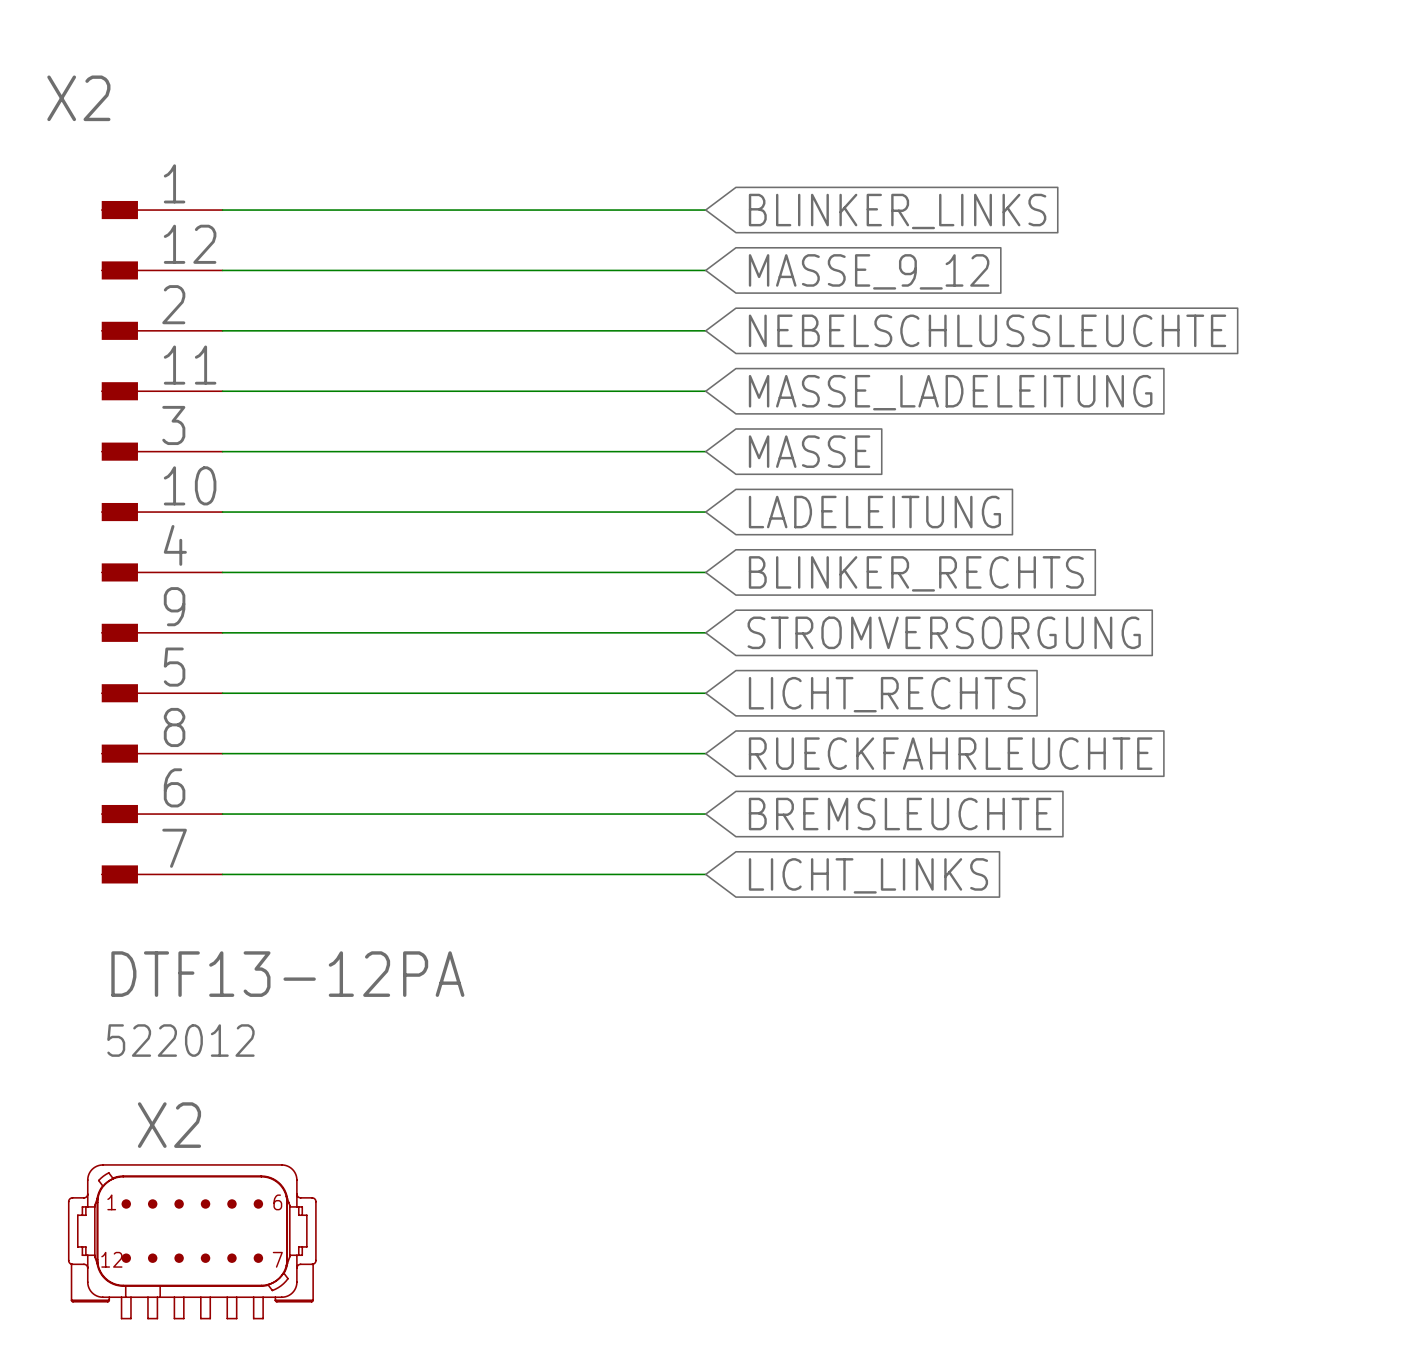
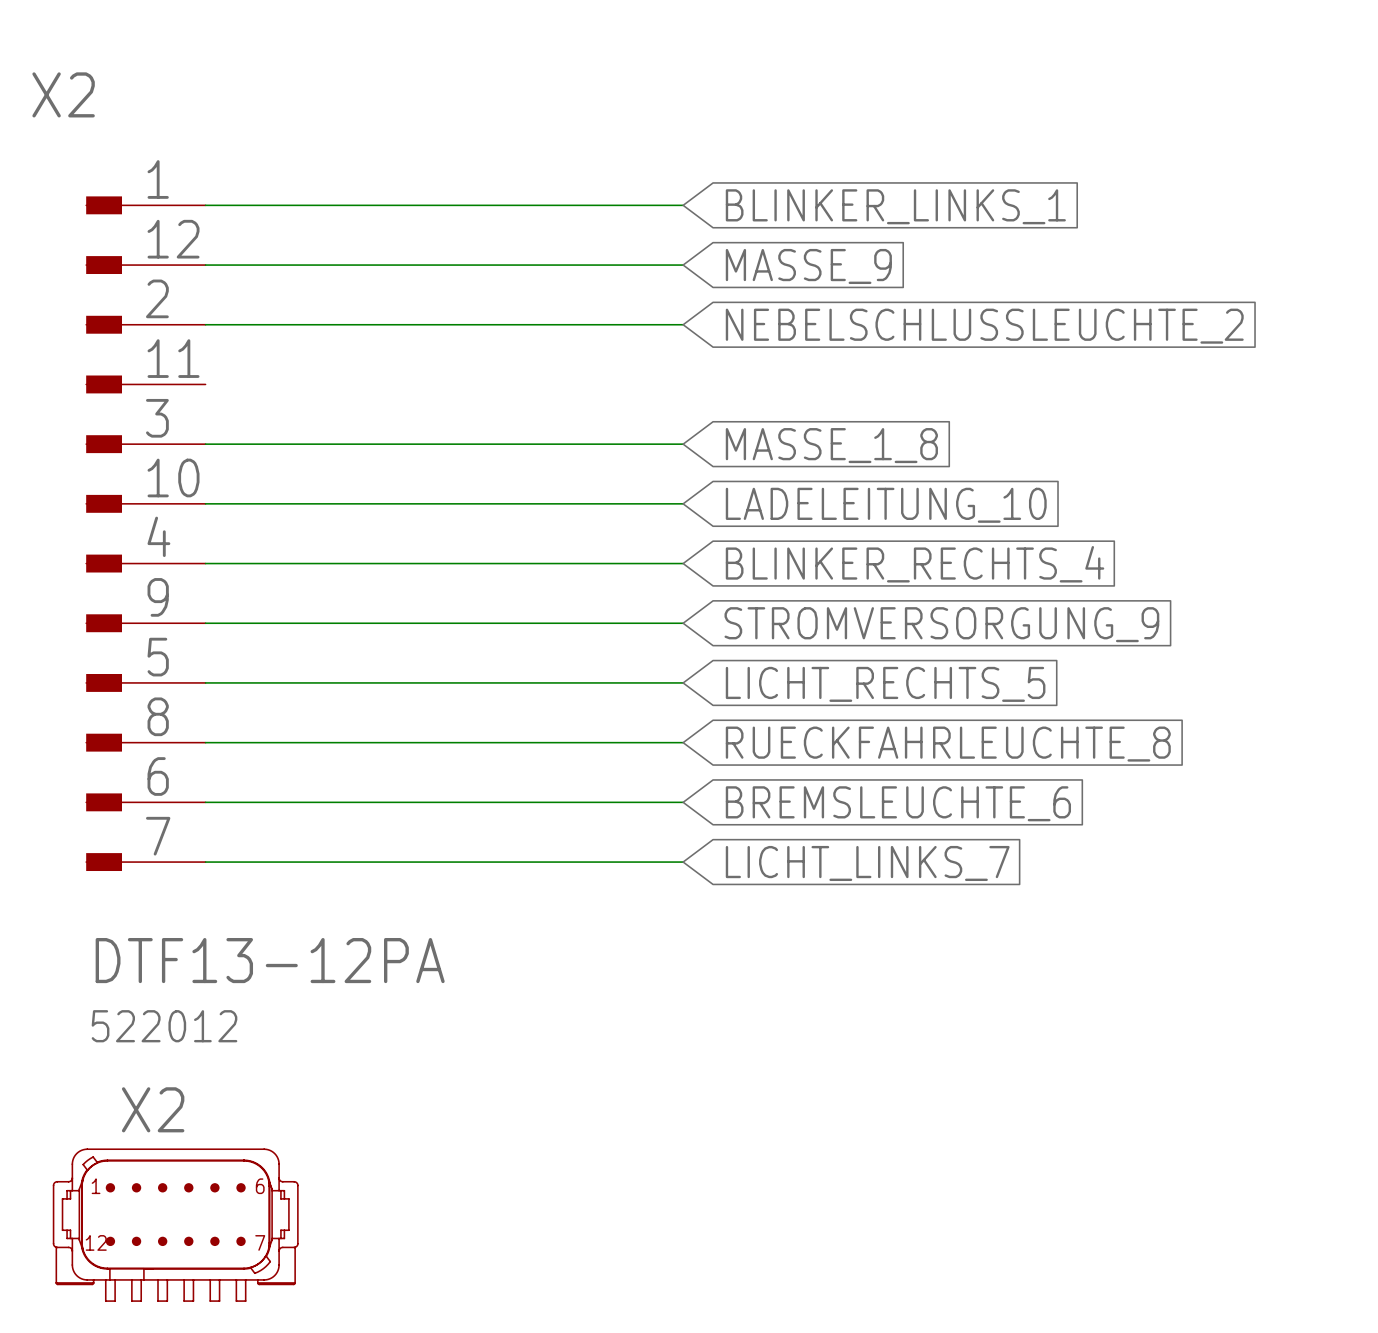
global label: BLINKER_LINKS (897, 211) -> BLINKER_LINKS_1 (895, 206)
global label: MASSE_9_12 (869, 271) -> MASSE_9 (808, 266)
global label: NEBELSCHLUSSLEUCHTE (987, 330) -> NEBELSCHLUSSLEUCHTE_2 (984, 326)
wire: (222, 391) (705, 391) -> none
global label: MASSE_LADELEITUNG (950, 392) -> none
global label: MASSE (809, 451) -> MASSE_1_8 (831, 445)
global label: LADELEITUNG (874, 512) -> LADELEITUNG_10 (886, 505)
global label: BLINKER_RECHTS (916, 573) -> BLINKER_RECHTS_4 (915, 564)
global label: STROMVERSORGUNG (944, 632) -> STROMVERSORGUNG_9 (941, 624)
global label: LICHT_RECHTS (887, 694) -> LICHT_RECHTS_5 (885, 684)
global label: RUECKFAHRLEUCHTE (950, 753) -> RUECKFAHRLEUCHTE_8 (948, 744)
global label: BREMSLEUCHTE (900, 814) -> BREMSLEUCHTE_6 (898, 803)
global label: LICHT_LINKS (868, 875) -> LICHT_LINKS_7 (867, 863)

